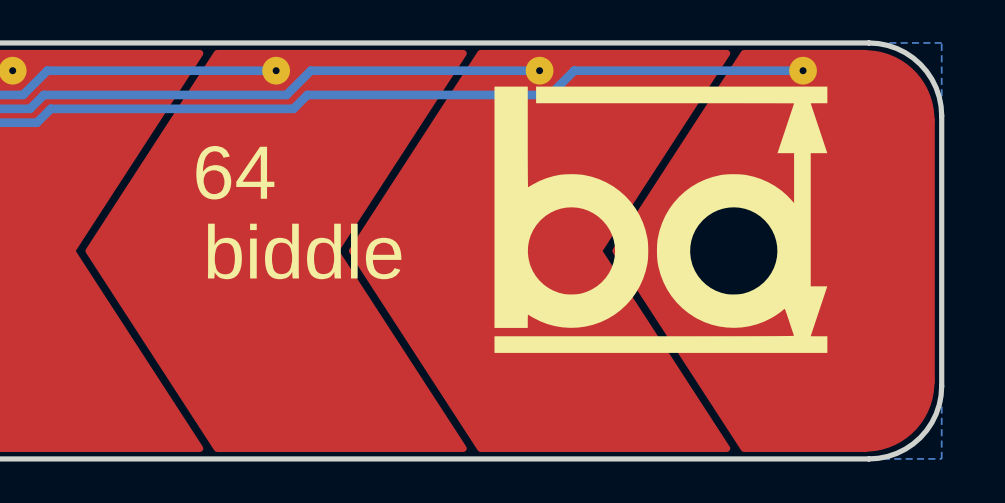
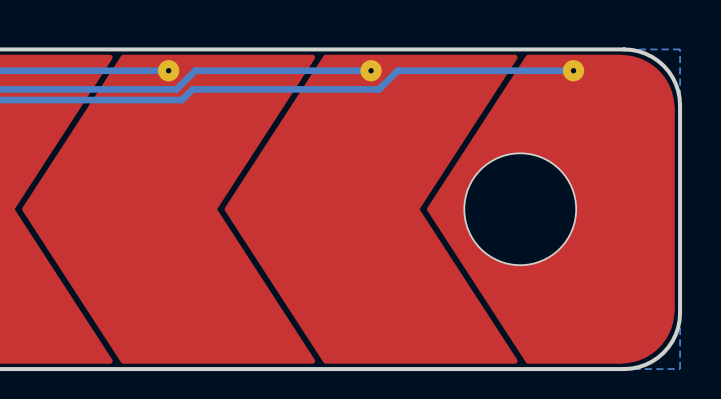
drawing: [494, 86, 828, 353] -> none
text: 64 (235, 172) -> none
text: biddle (304, 251) -> none

